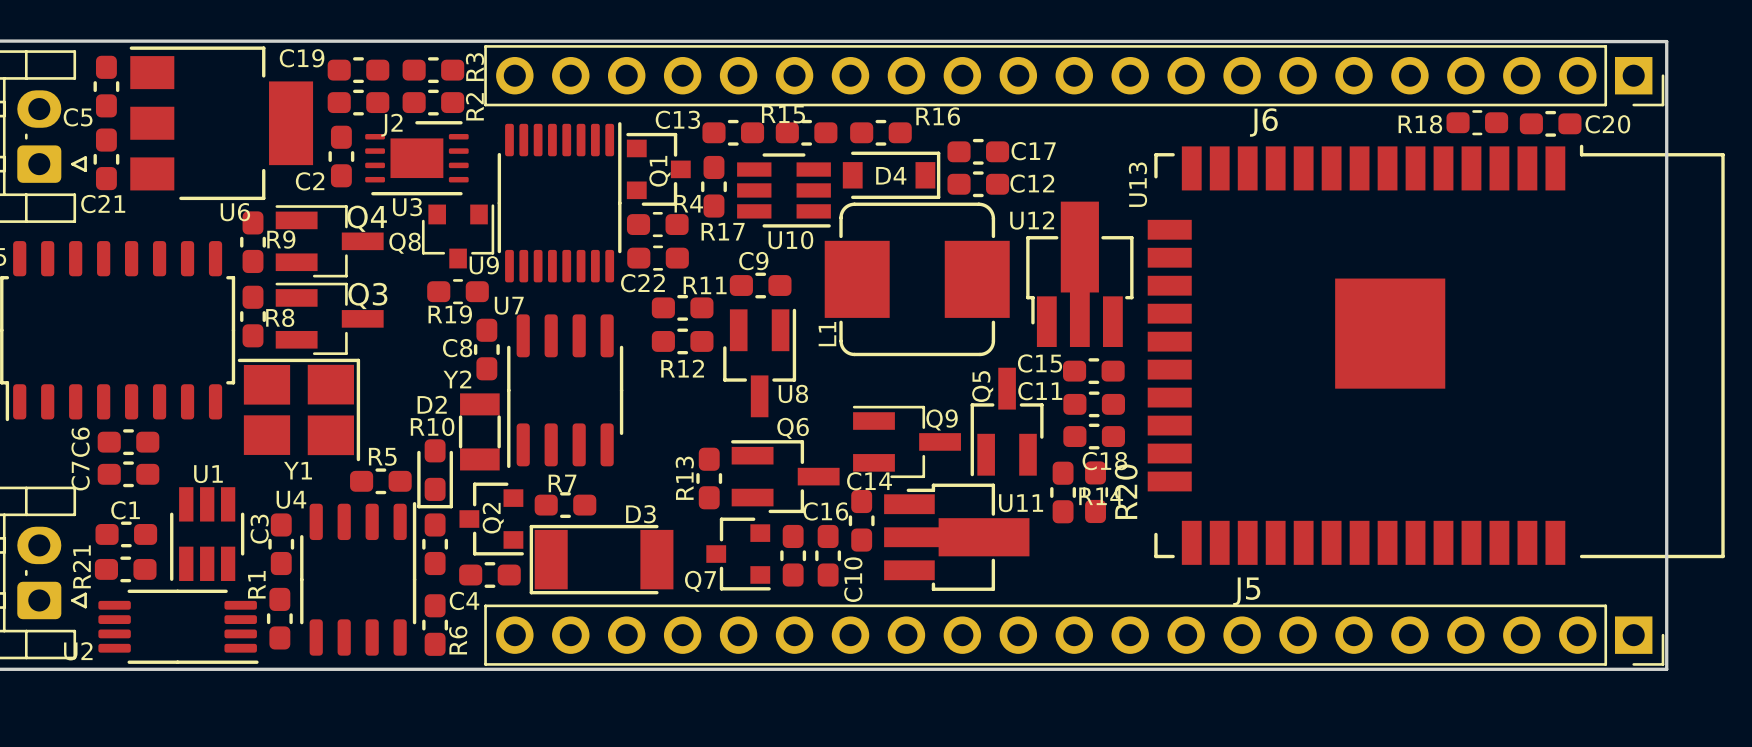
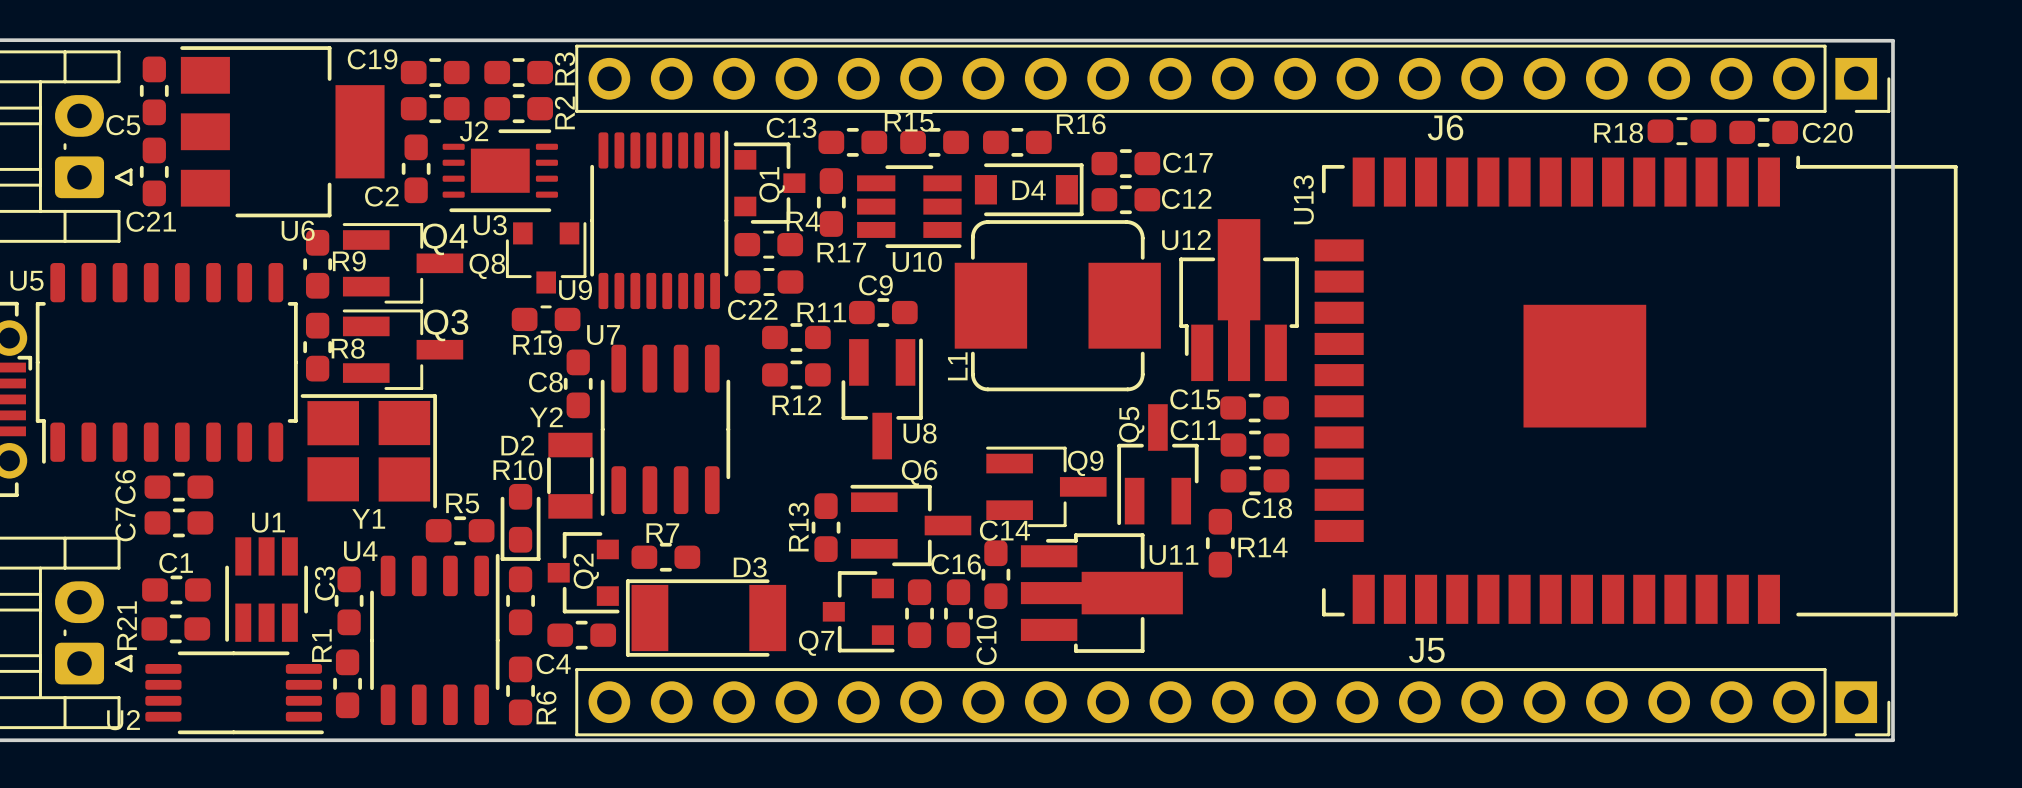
R20: (1095, 492) -> none

